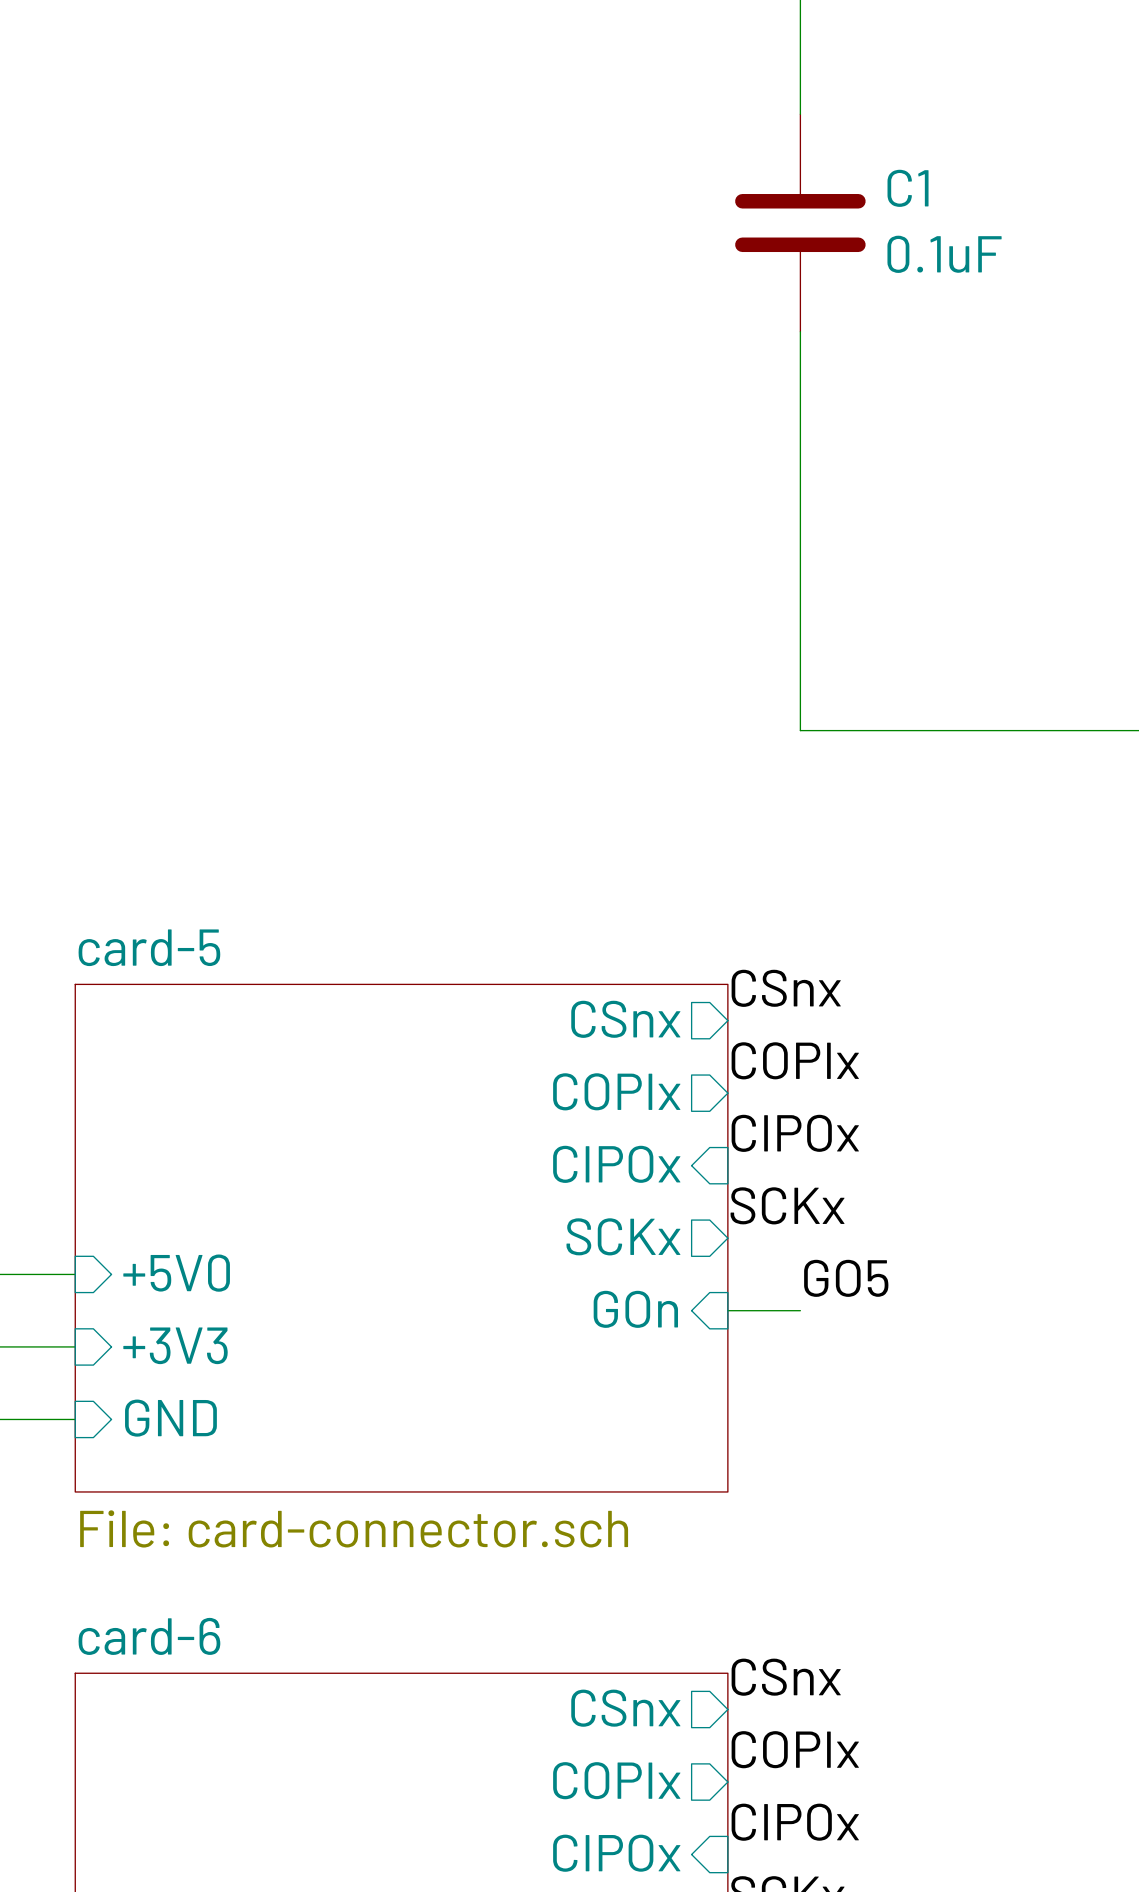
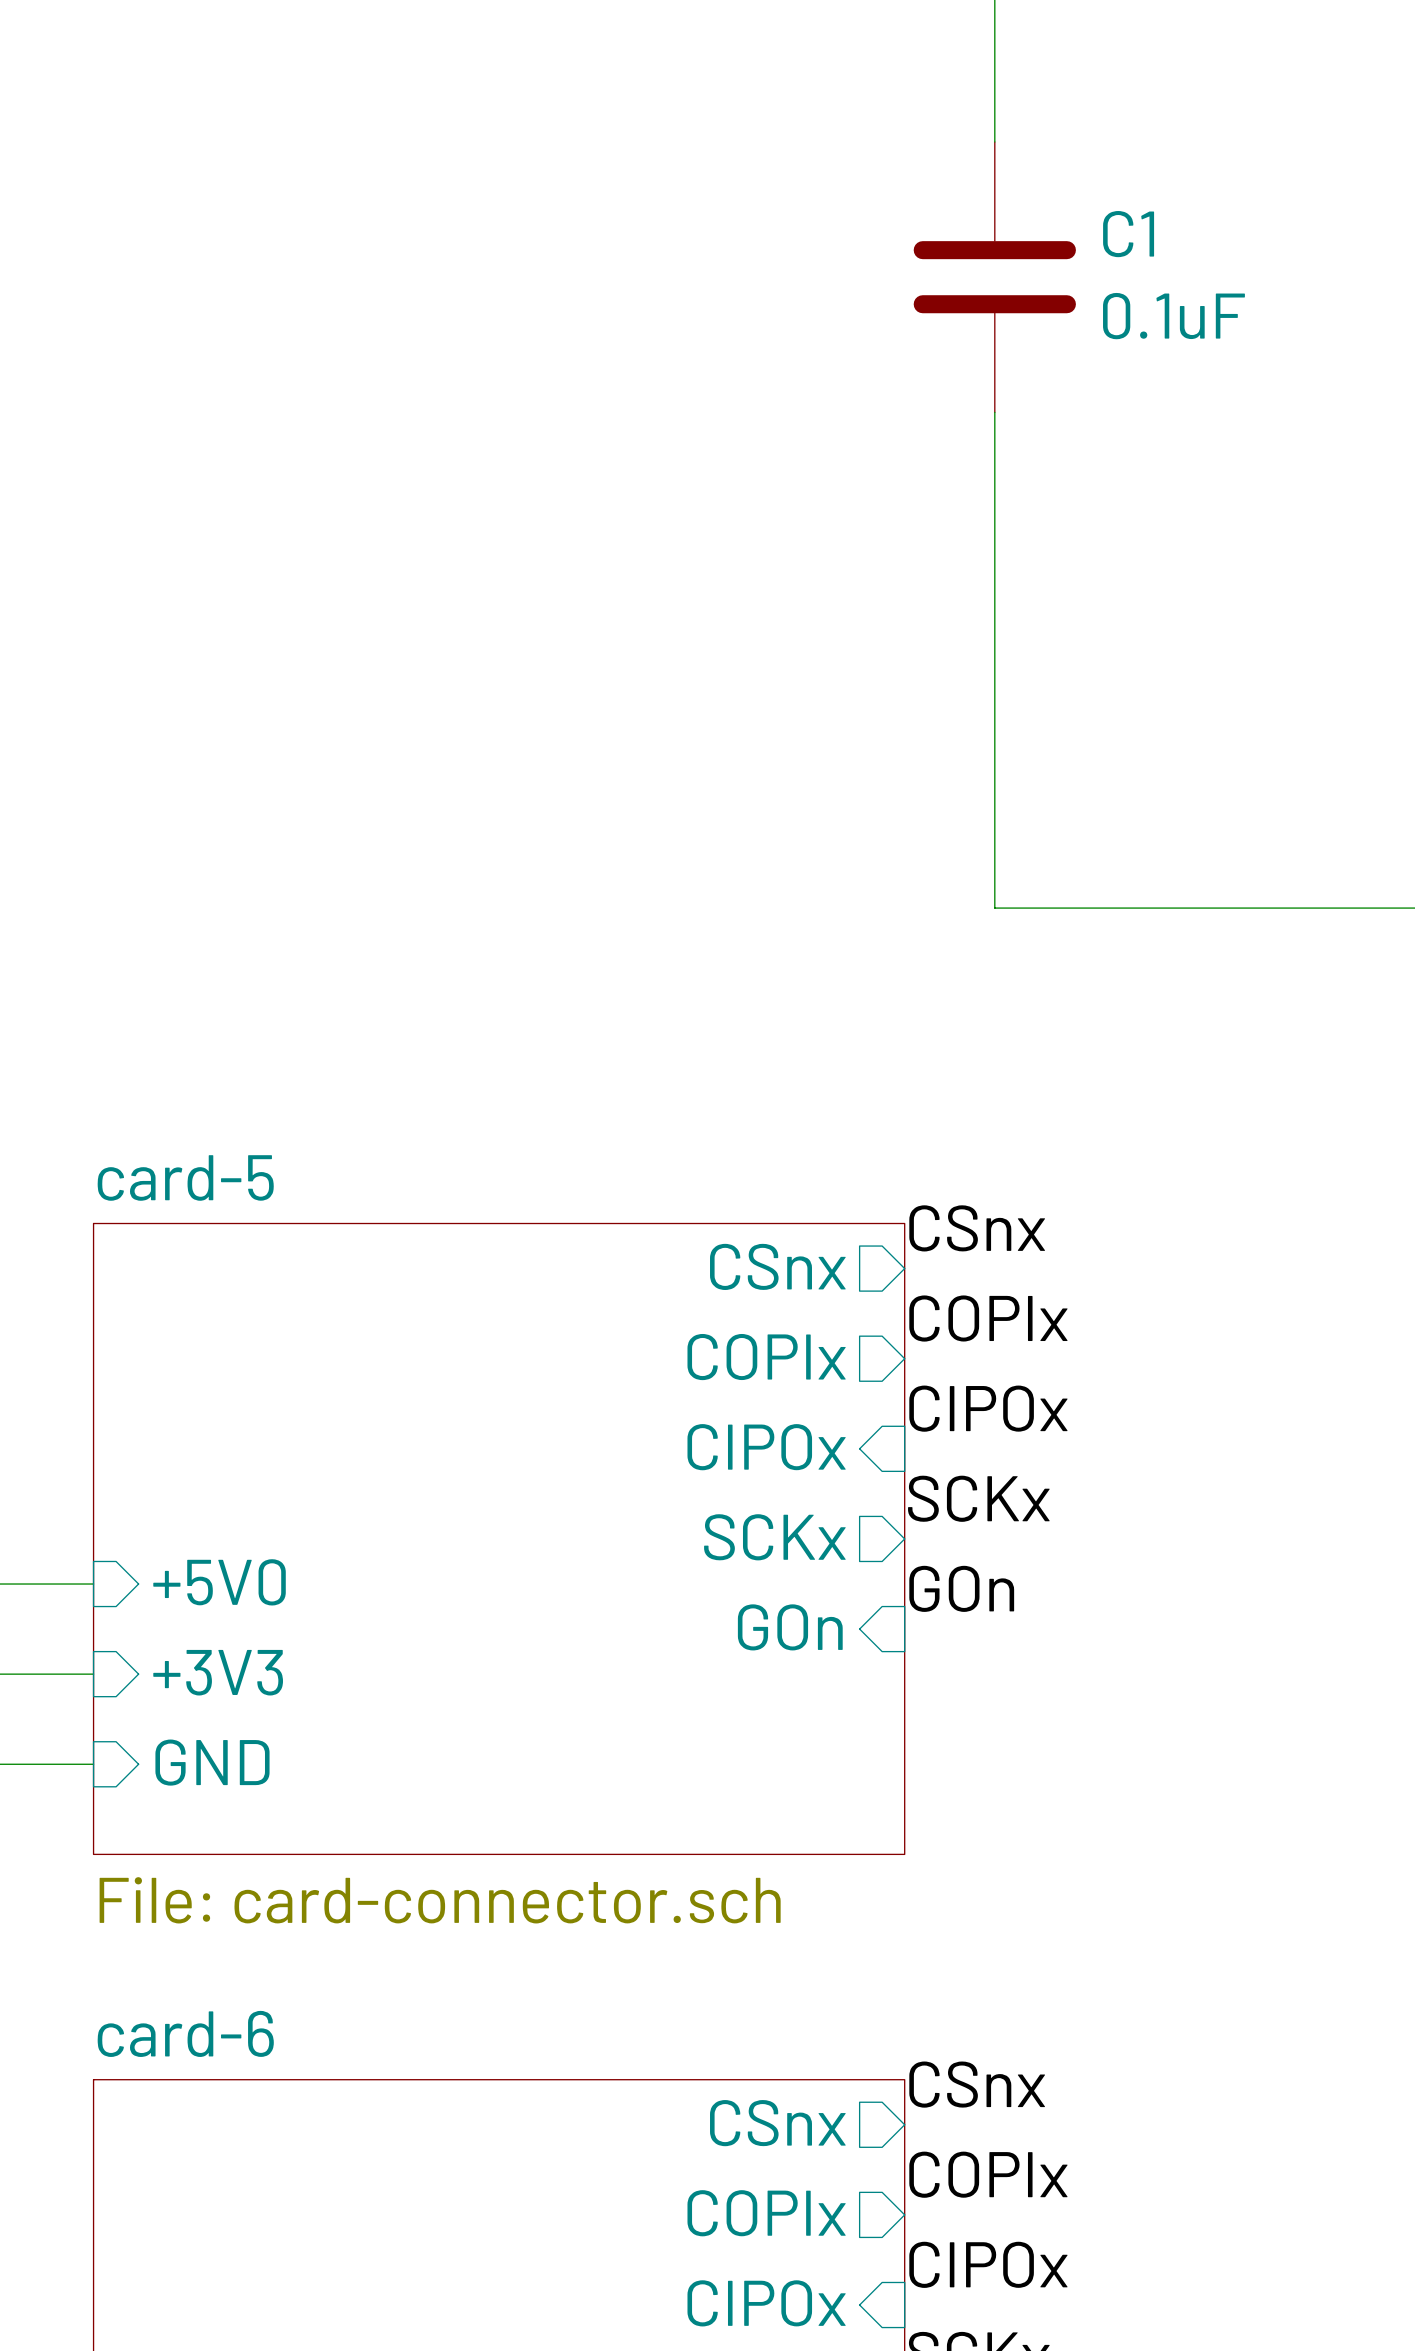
label: GO5 (846, 1278) -> GOn (961, 1588)
wire: (727, 1310) (800, 1310) -> none

